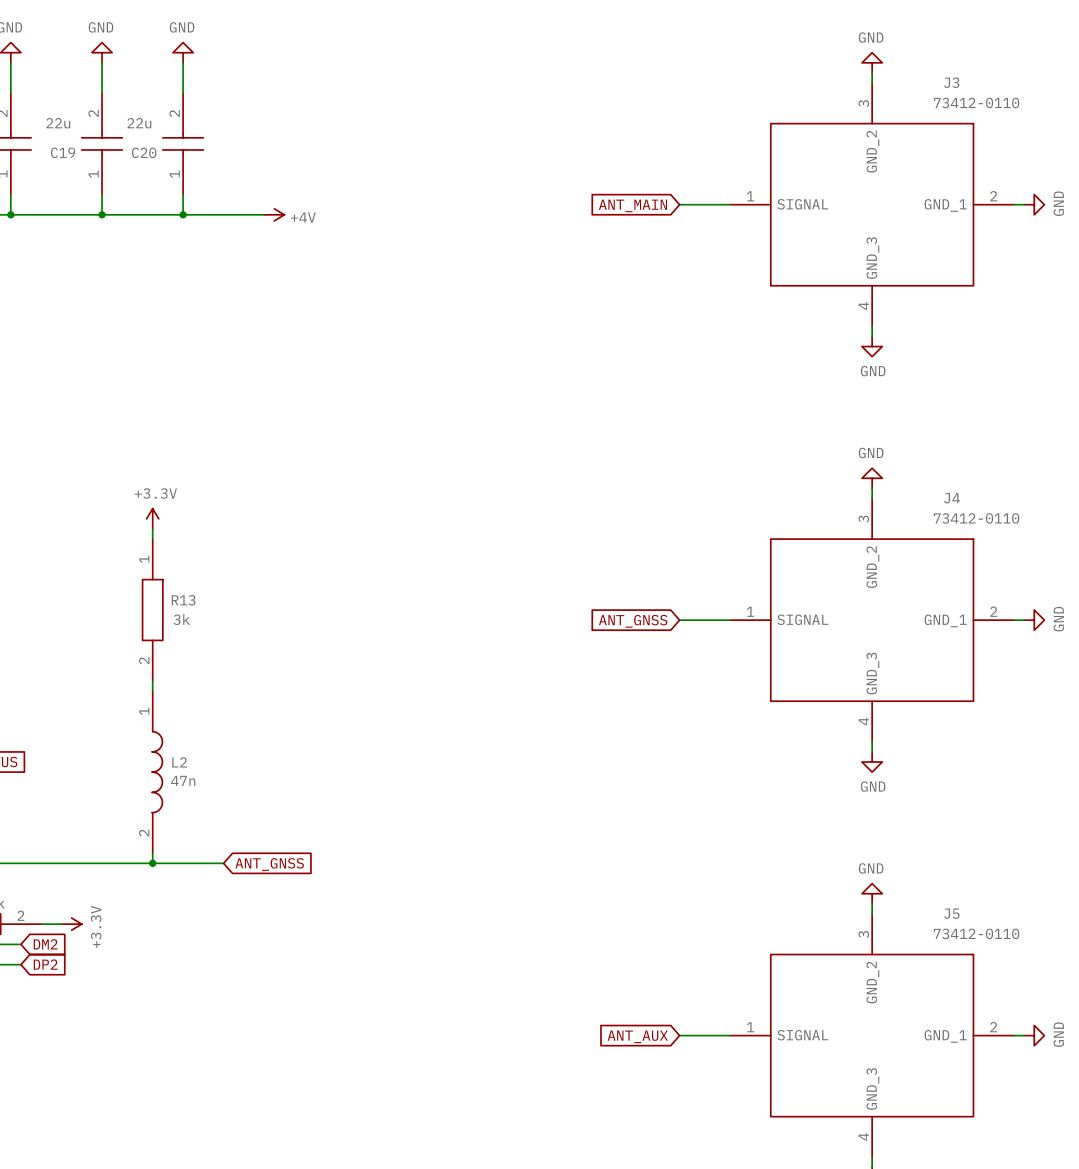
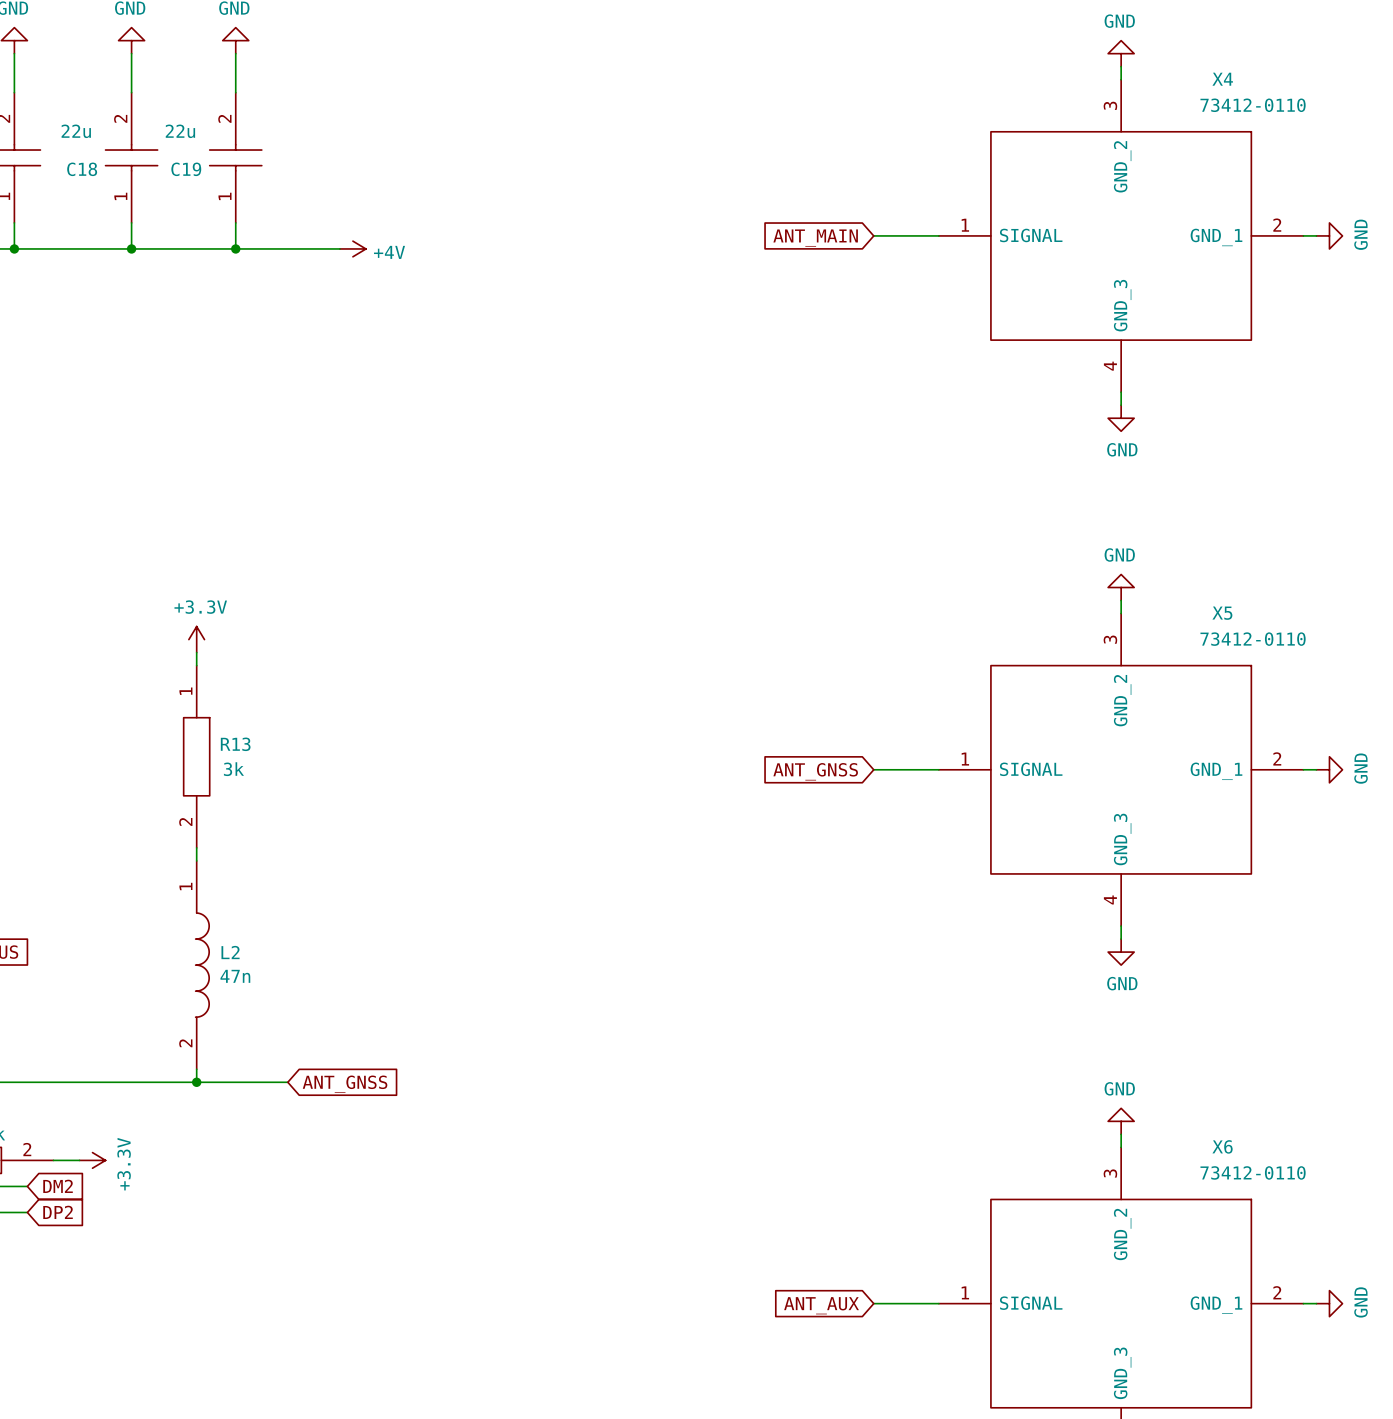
J3 name: J3 (951, 82) -> X4 (1222, 79)
C19 name: C19 (63, 152) -> C18 (82, 169)
C20 name: C20 (144, 152) -> C19 (186, 169)
J4 name: J4 (952, 498) -> X5 (1222, 613)
J5 name: J5 (951, 913) -> X6 (1222, 1146)

